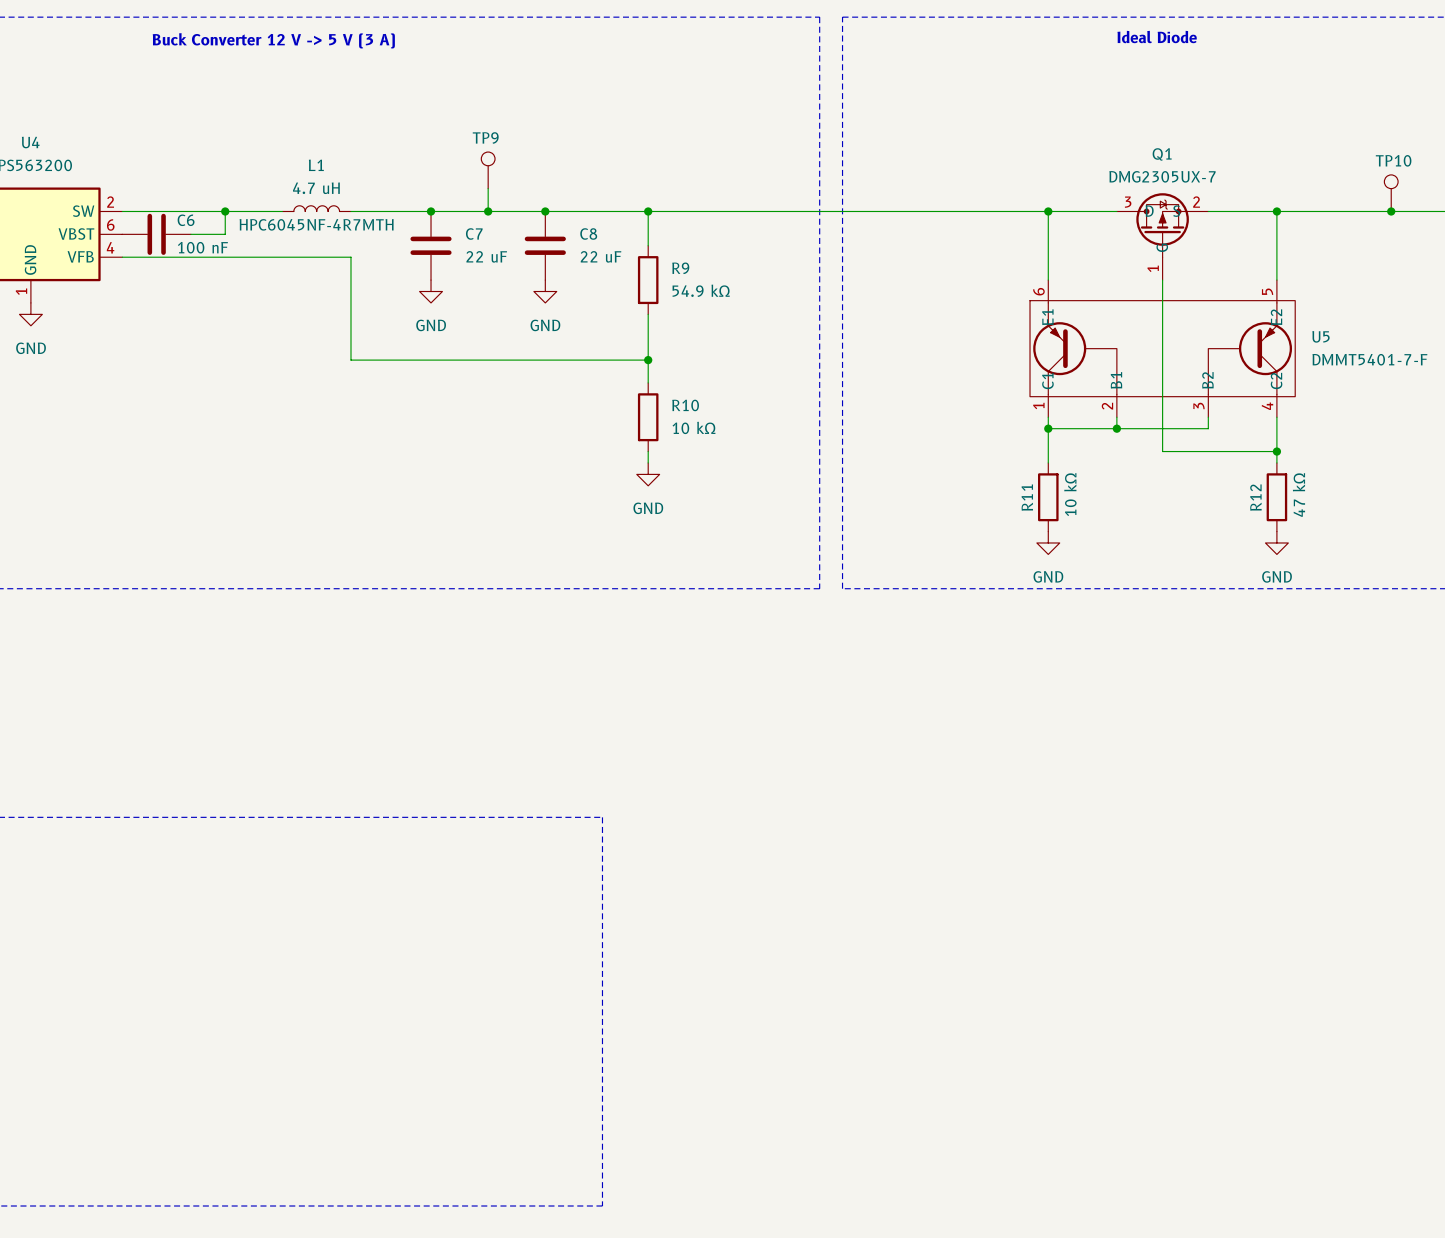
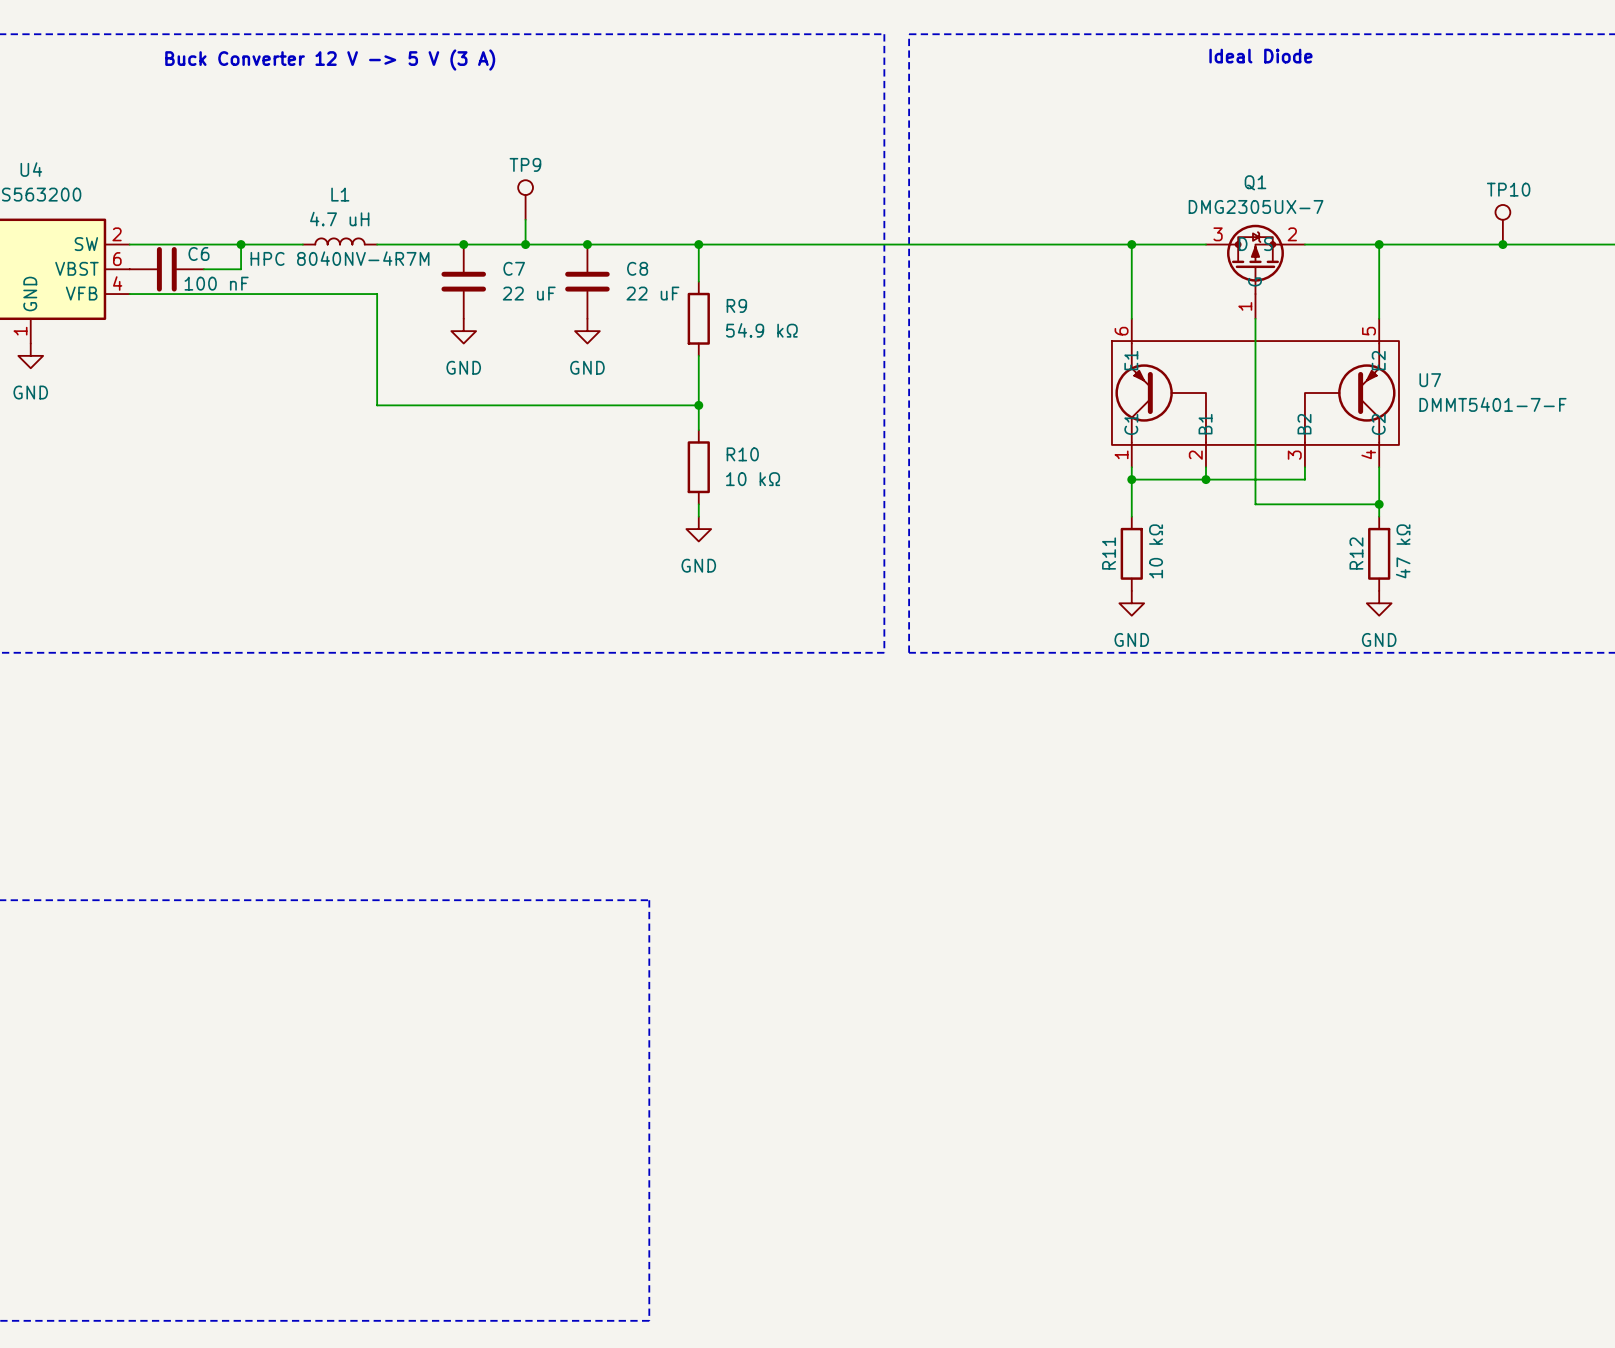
L1 text: HPC6045NF-4R7MTH (316, 224) -> HPC 8040NV-4R7M (340, 258)
U5 name: U5 (1320, 336) -> U7 (1430, 380)

